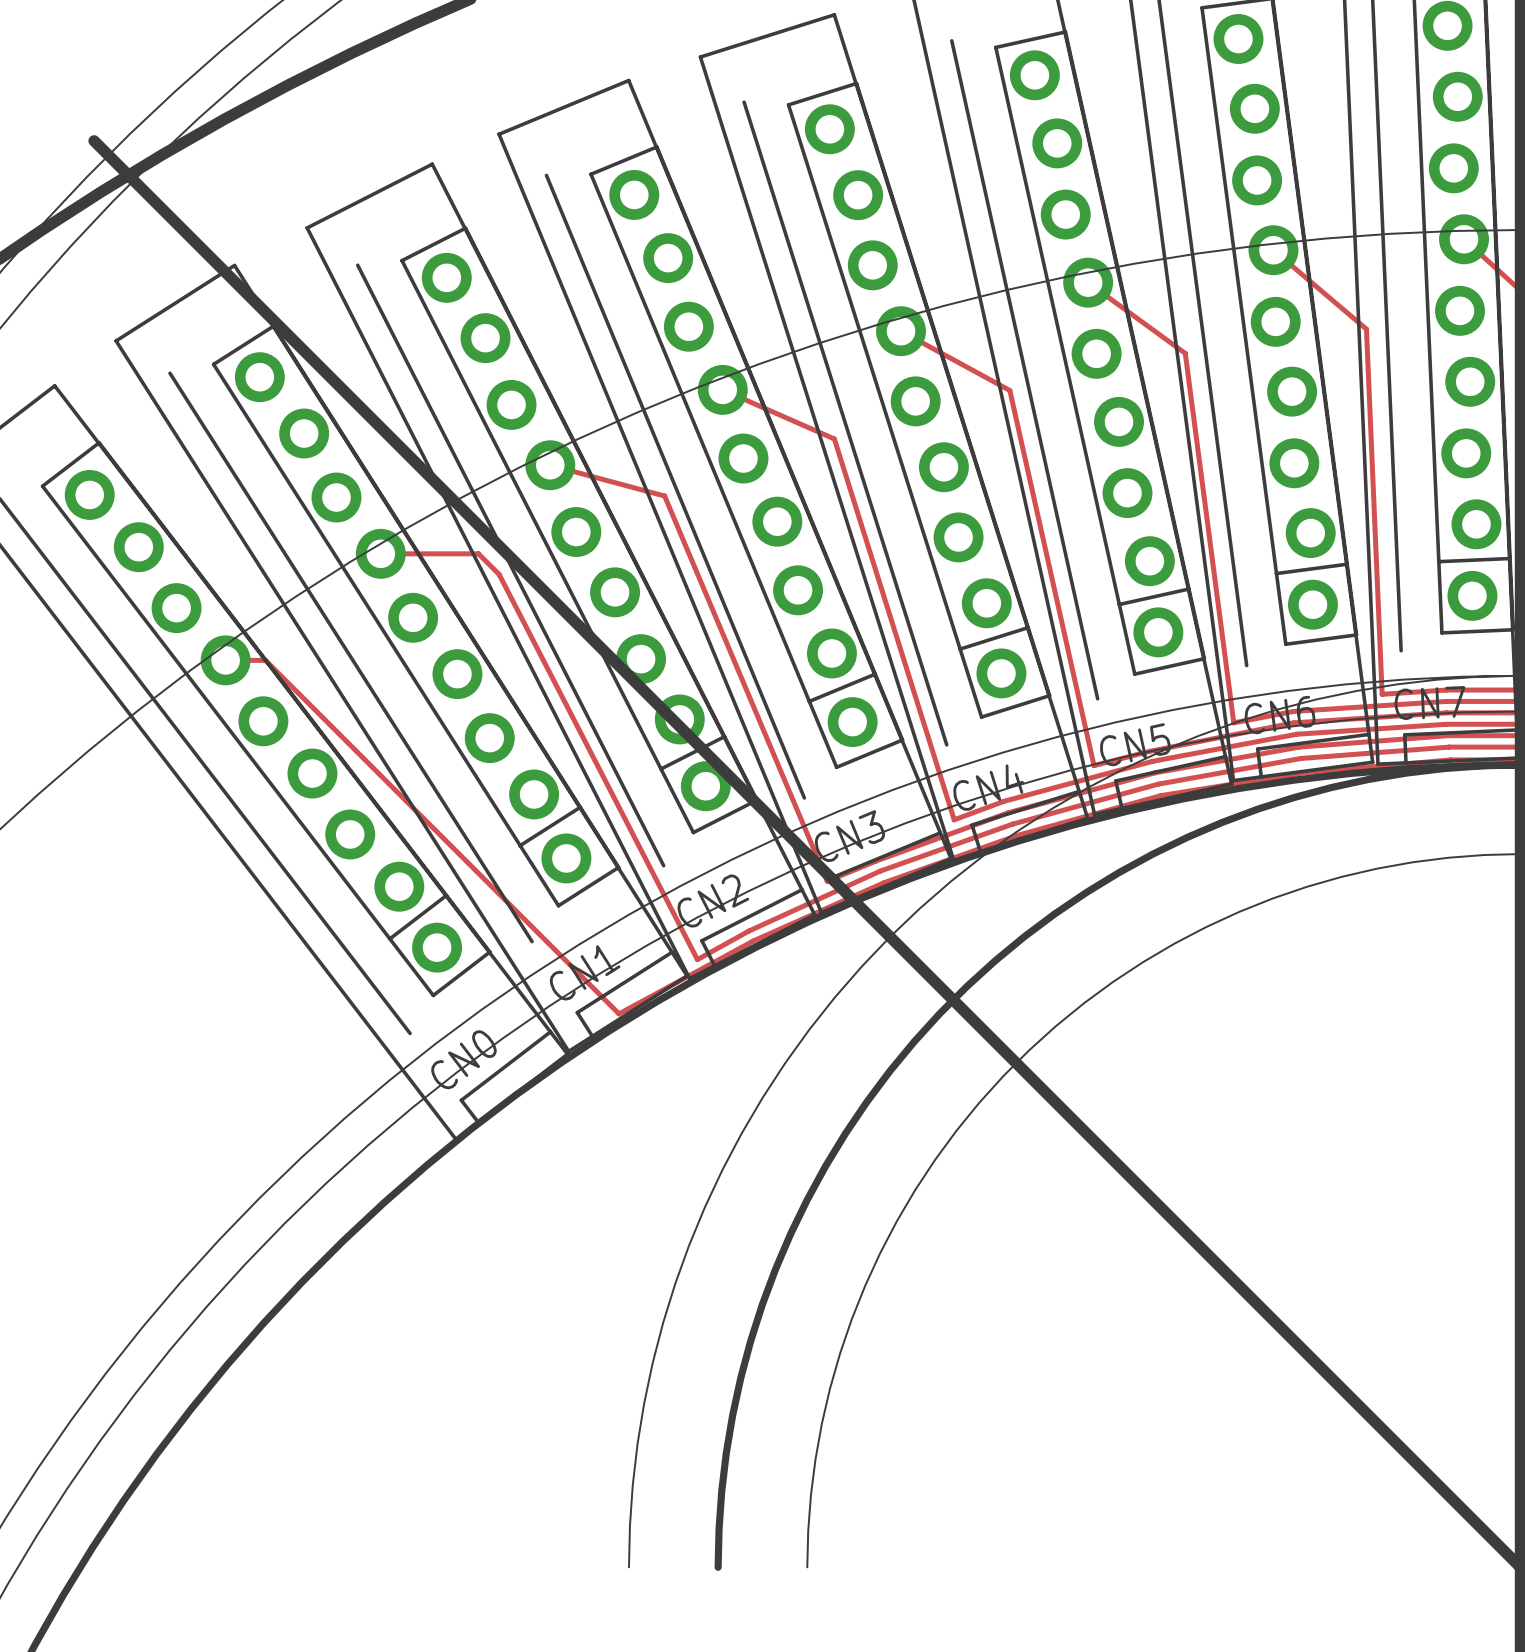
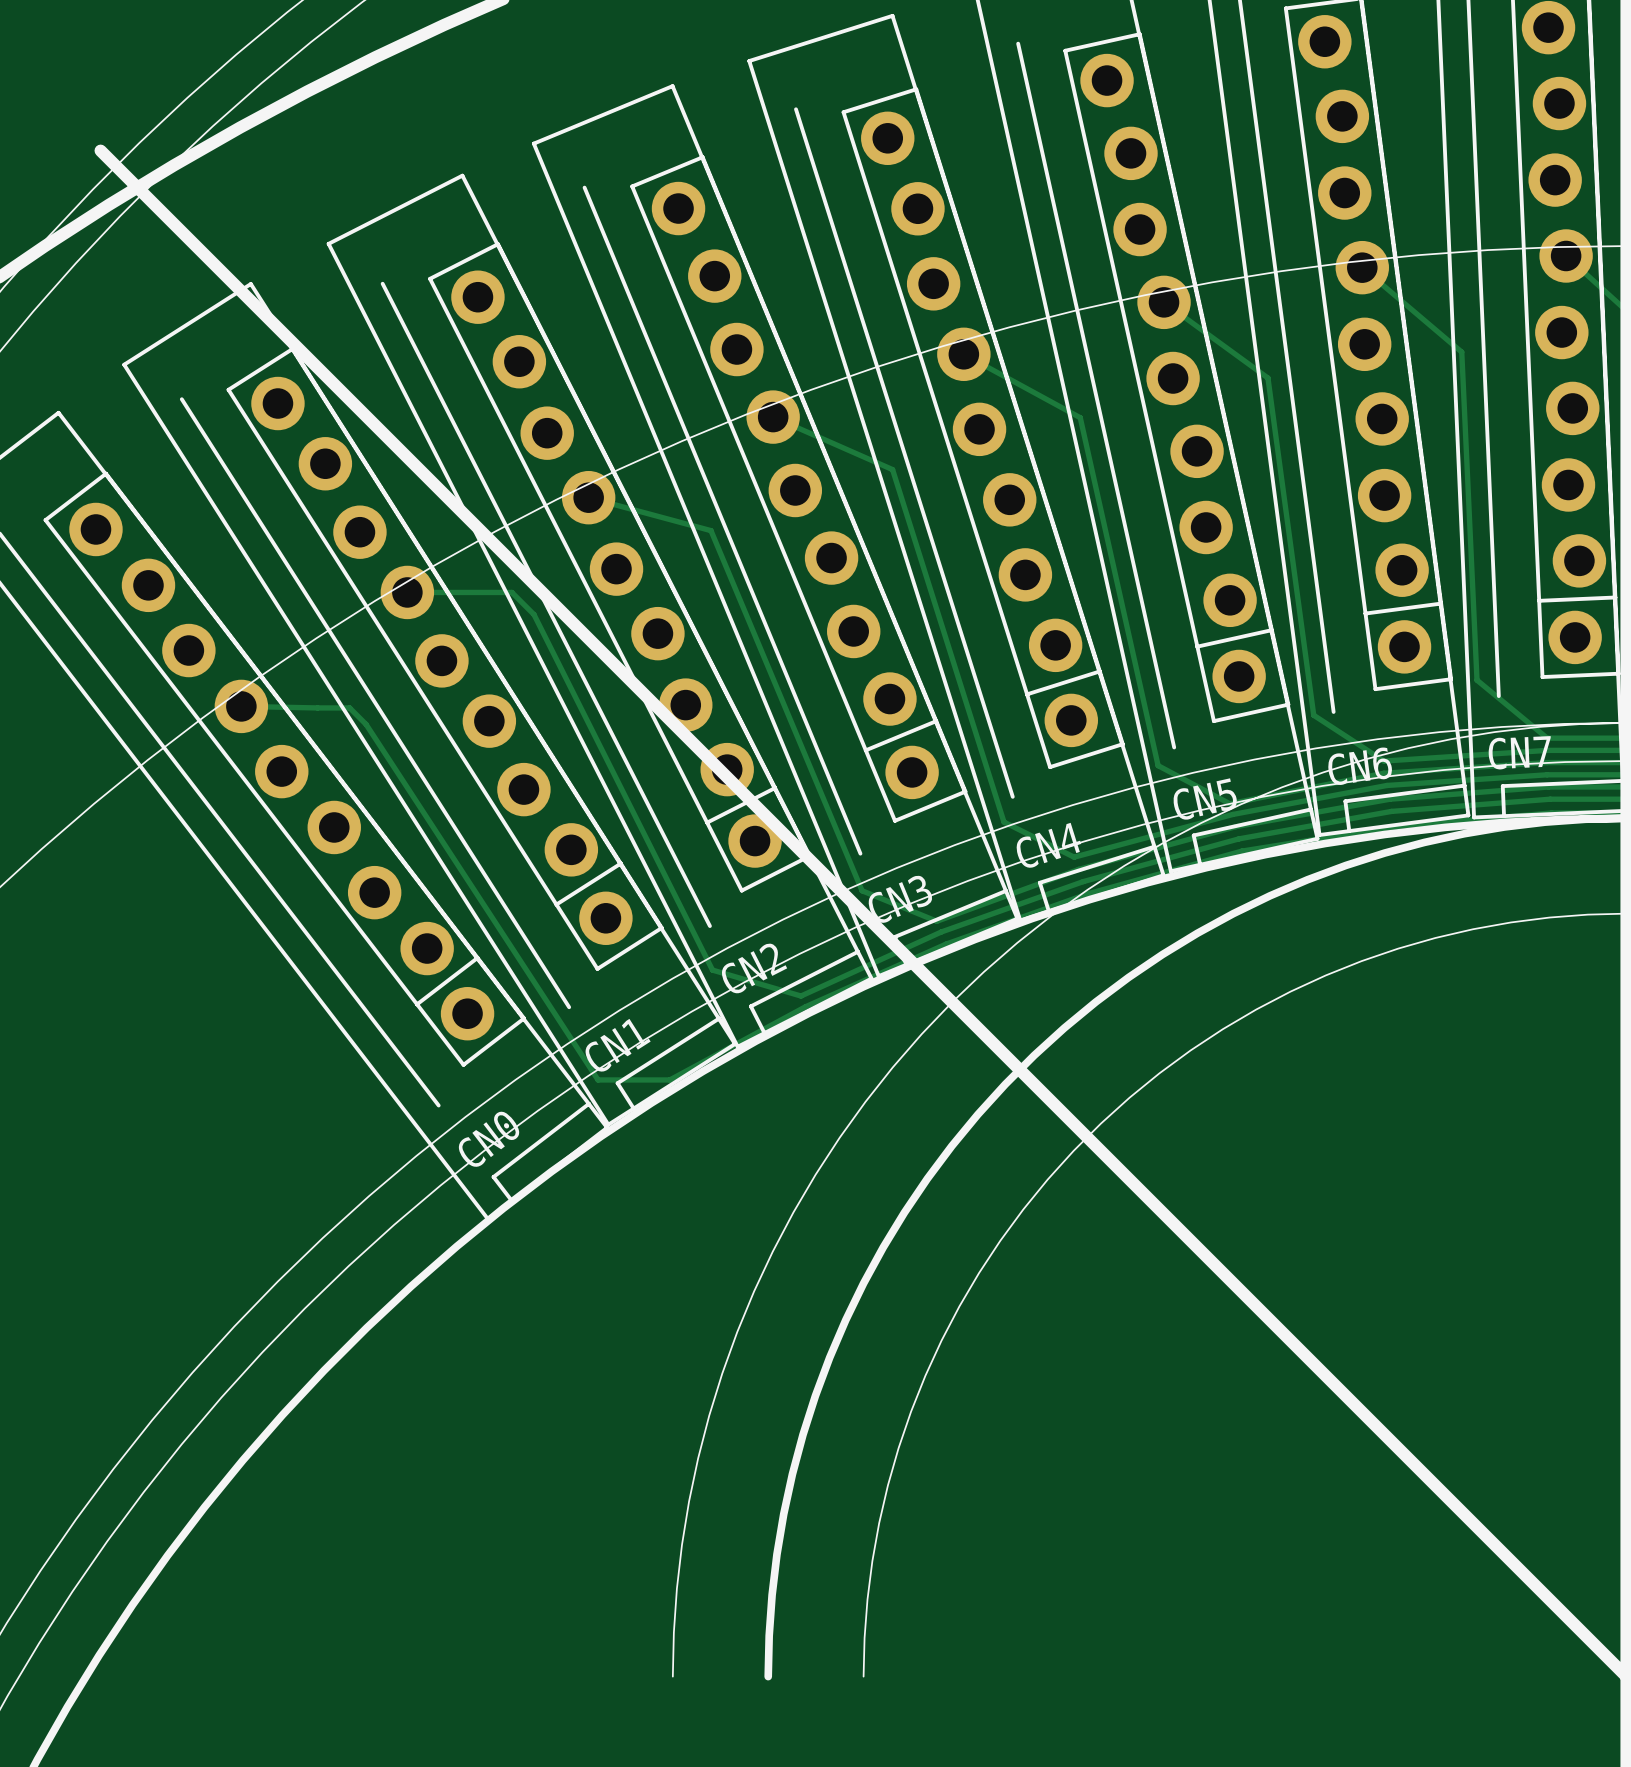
track: (1366, 329) (1382, 694) (1446, 690) -> (1461, 352) (1477, 680) (1547, 738)
track: (1185, 353) (1233, 722) (1293, 711) -> (1267, 378) (1313, 715) (1383, 761)
track: (1009, 390) (1094, 765) (1149, 751) -> (1080, 417) (1158, 765) (1229, 803)
track: (834, 438) (954, 819) (1004, 801) -> (892, 469) (1003, 822) (1074, 857)
track: (664, 496) (827, 881) (875, 861) -> (710, 530) (862, 890) (936, 921)
track: (499, 574) (697, 959) (748, 931) -> (533, 614) (712, 970) (801, 996)
track: (225, 660) (265, 660) (619, 1013) (753, 941) -> (241, 706) (349, 707) (366, 724) (598, 1079) (669, 1079) (805, 1006)

